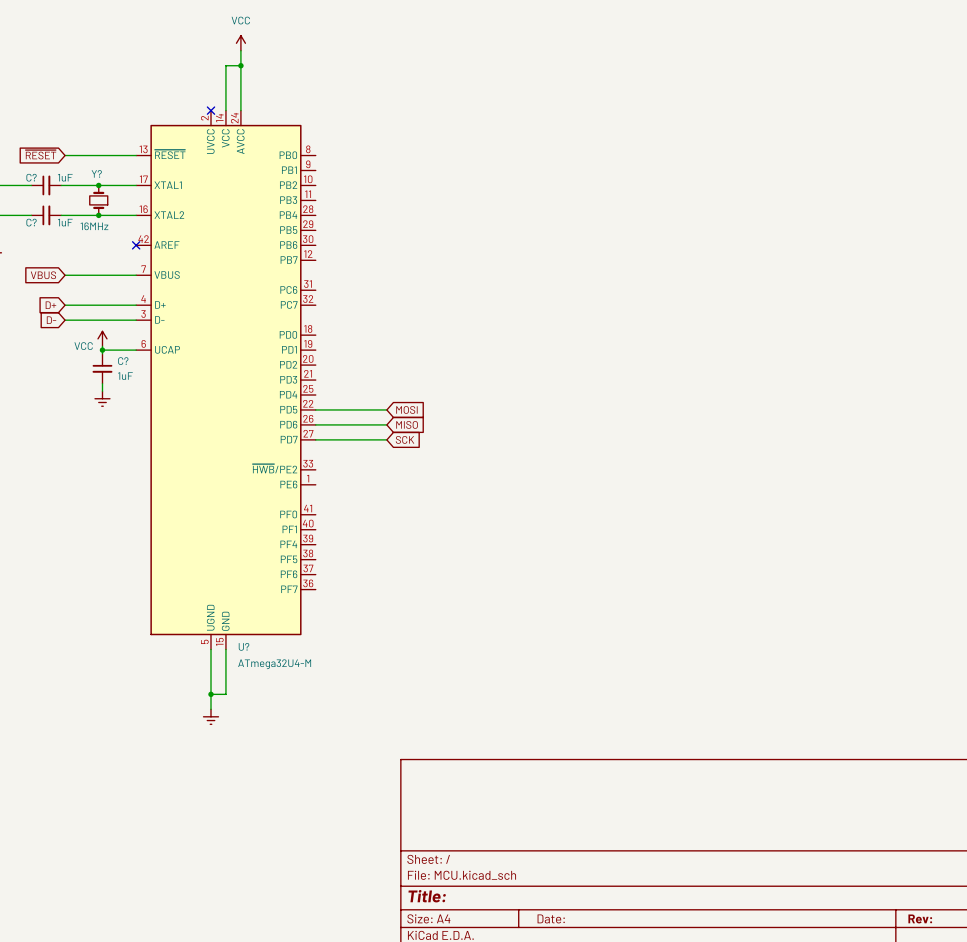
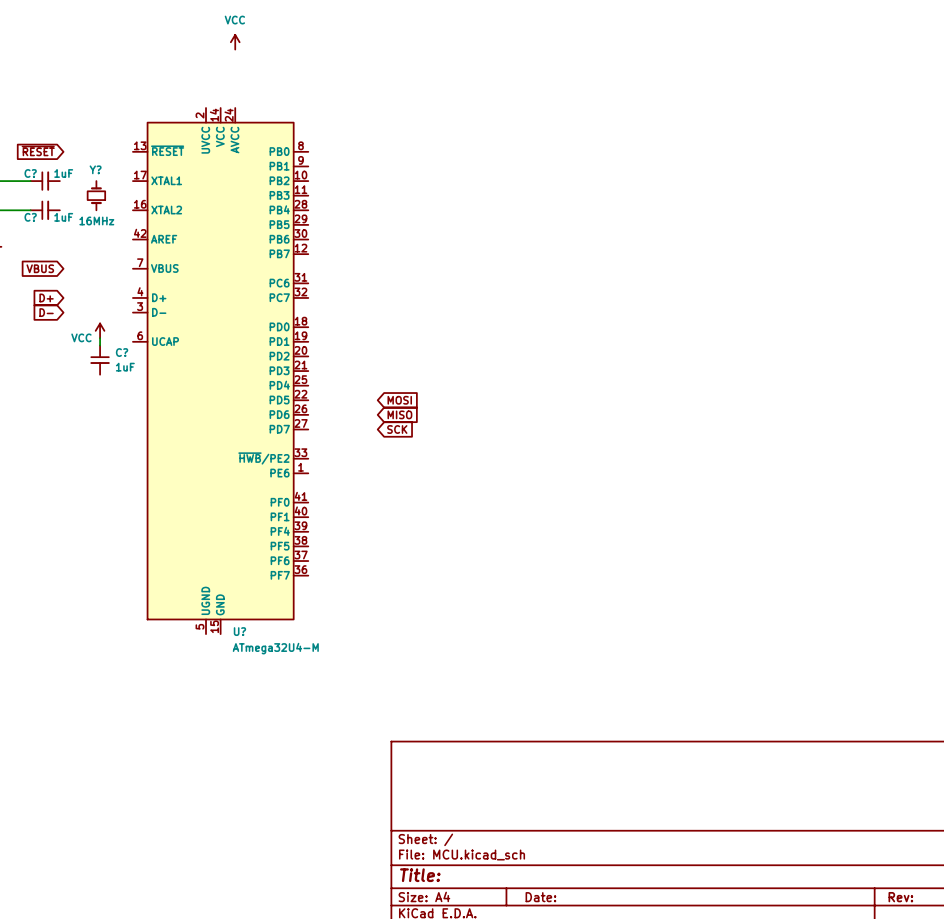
wire: (240, 50) (240, 110) -> none
wire: (240, 65) (225, 65) (225, 110) -> none
junction: (240, 65) -> none
no-connect mark: (211, 110) -> none
wire: (65, 155) (136, 155) -> none
wire: (61, 185) (136, 185) -> none
junction: (98, 185) -> none
wire: (61, 215) (136, 215) -> none
junction: (98, 215) -> none
no-connect mark: (136, 245) -> none
wire: (65, 275) (136, 275) -> none
wire: (65, 305) (136, 305) -> none
wire: (65, 320) (136, 320) -> none
wire: (102, 350) (136, 350) -> none
junction: (102, 350) -> none
wire: (102, 383) (102, 391) -> none
power symbol: (102, 398) -> none
wire: (315, 409) (386, 409) -> none
wire: (315, 424) (386, 424) -> none
wire: (315, 439) (386, 439) -> none
wire: (211, 649) (211, 709) -> none
wire: (225, 649) (225, 694) (211, 694) -> none
junction: (211, 694) -> none
power symbol: (211, 716) -> none

